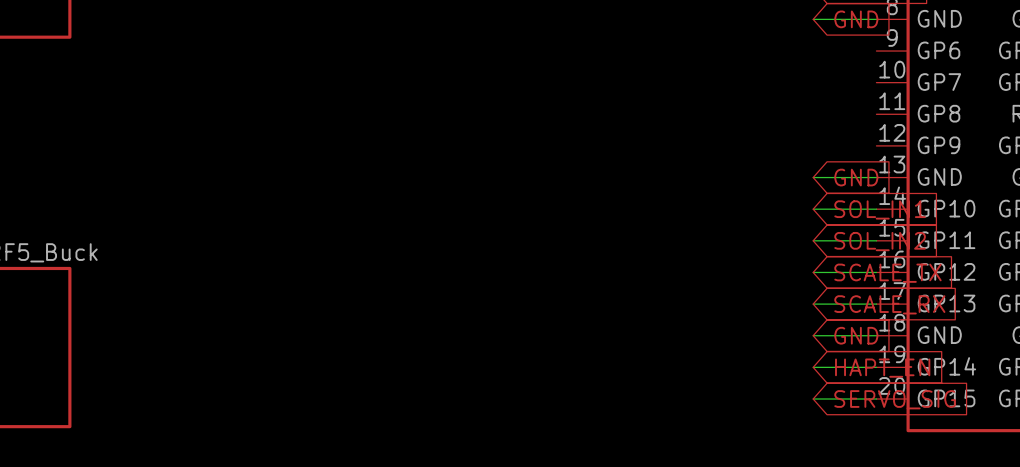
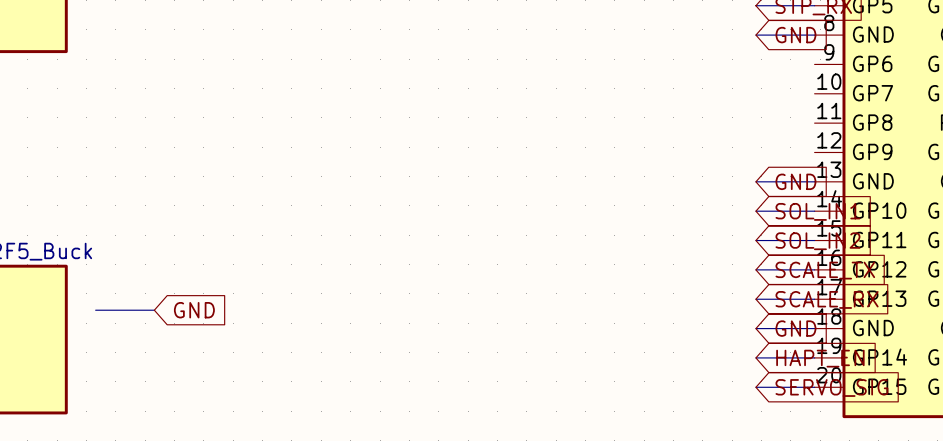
wire: none -> (95, 310) (154, 310)
global label: none -> GND (194, 310)

